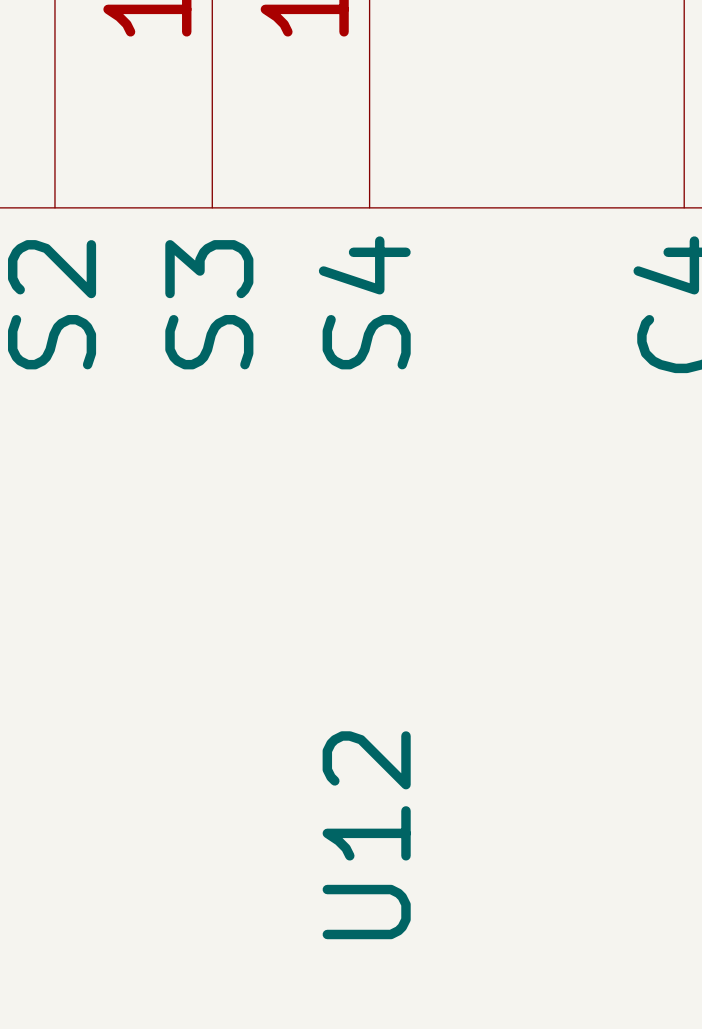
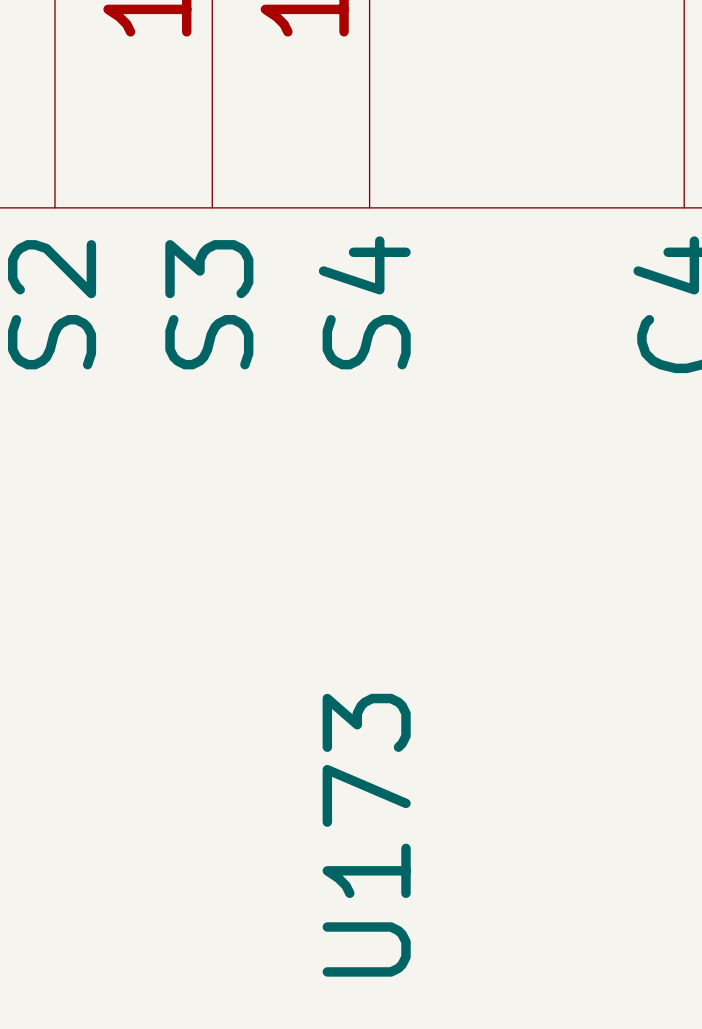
U12 name: U12 (366, 835) -> U173 (366, 835)

